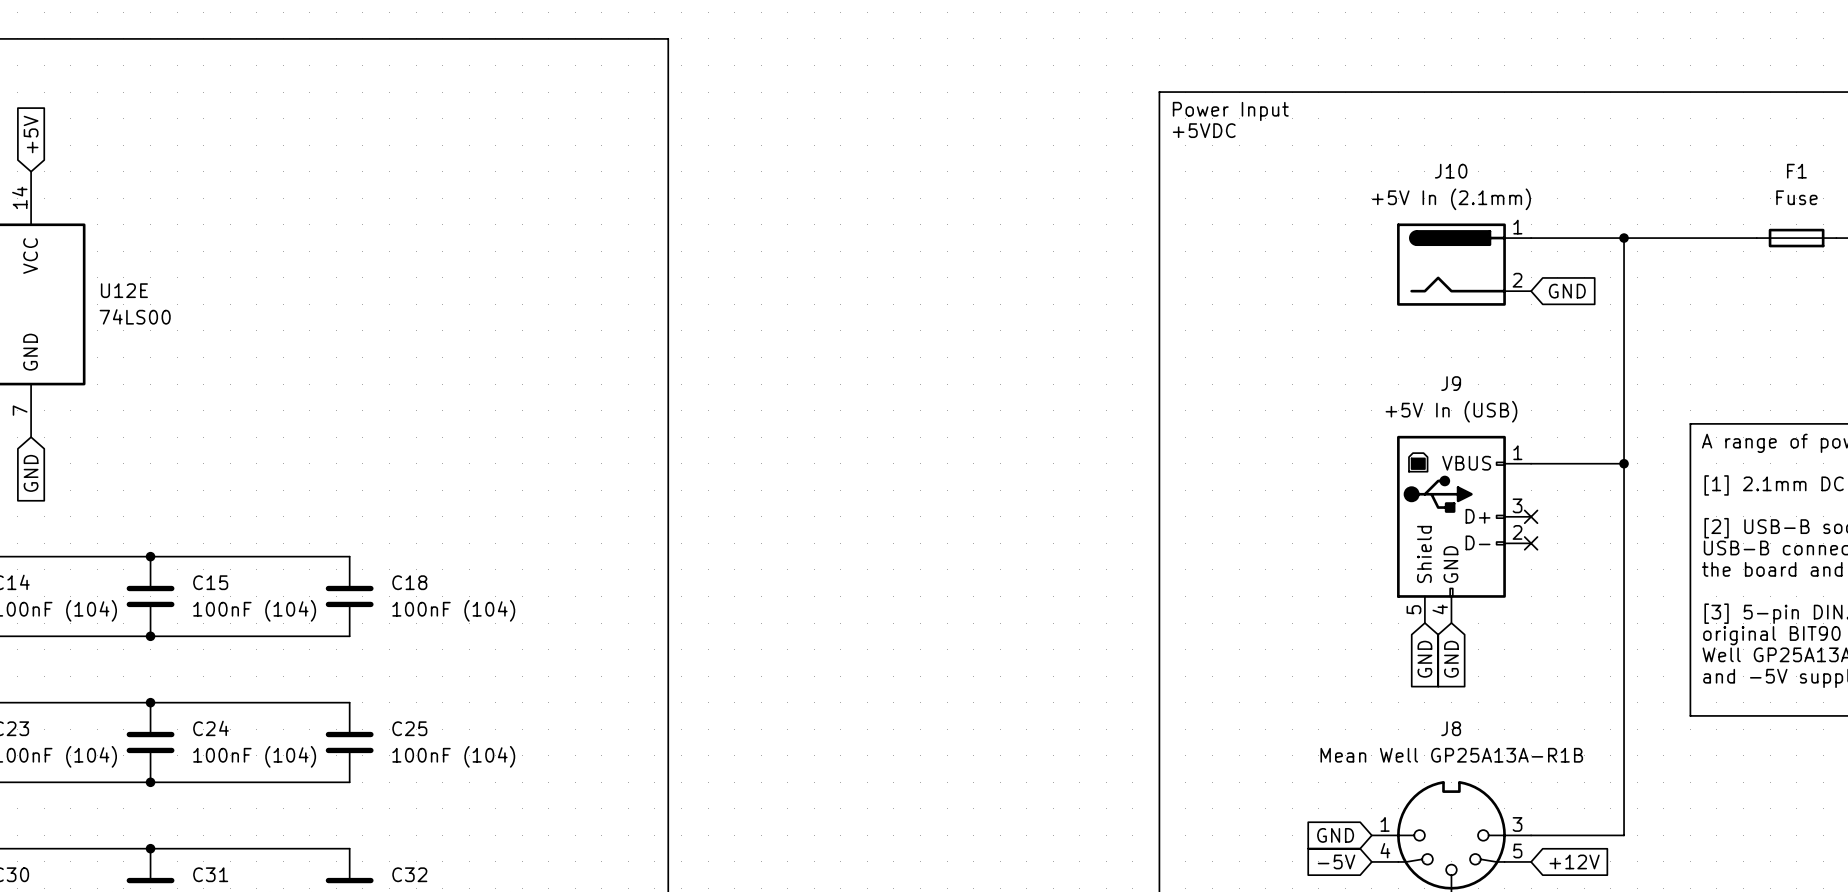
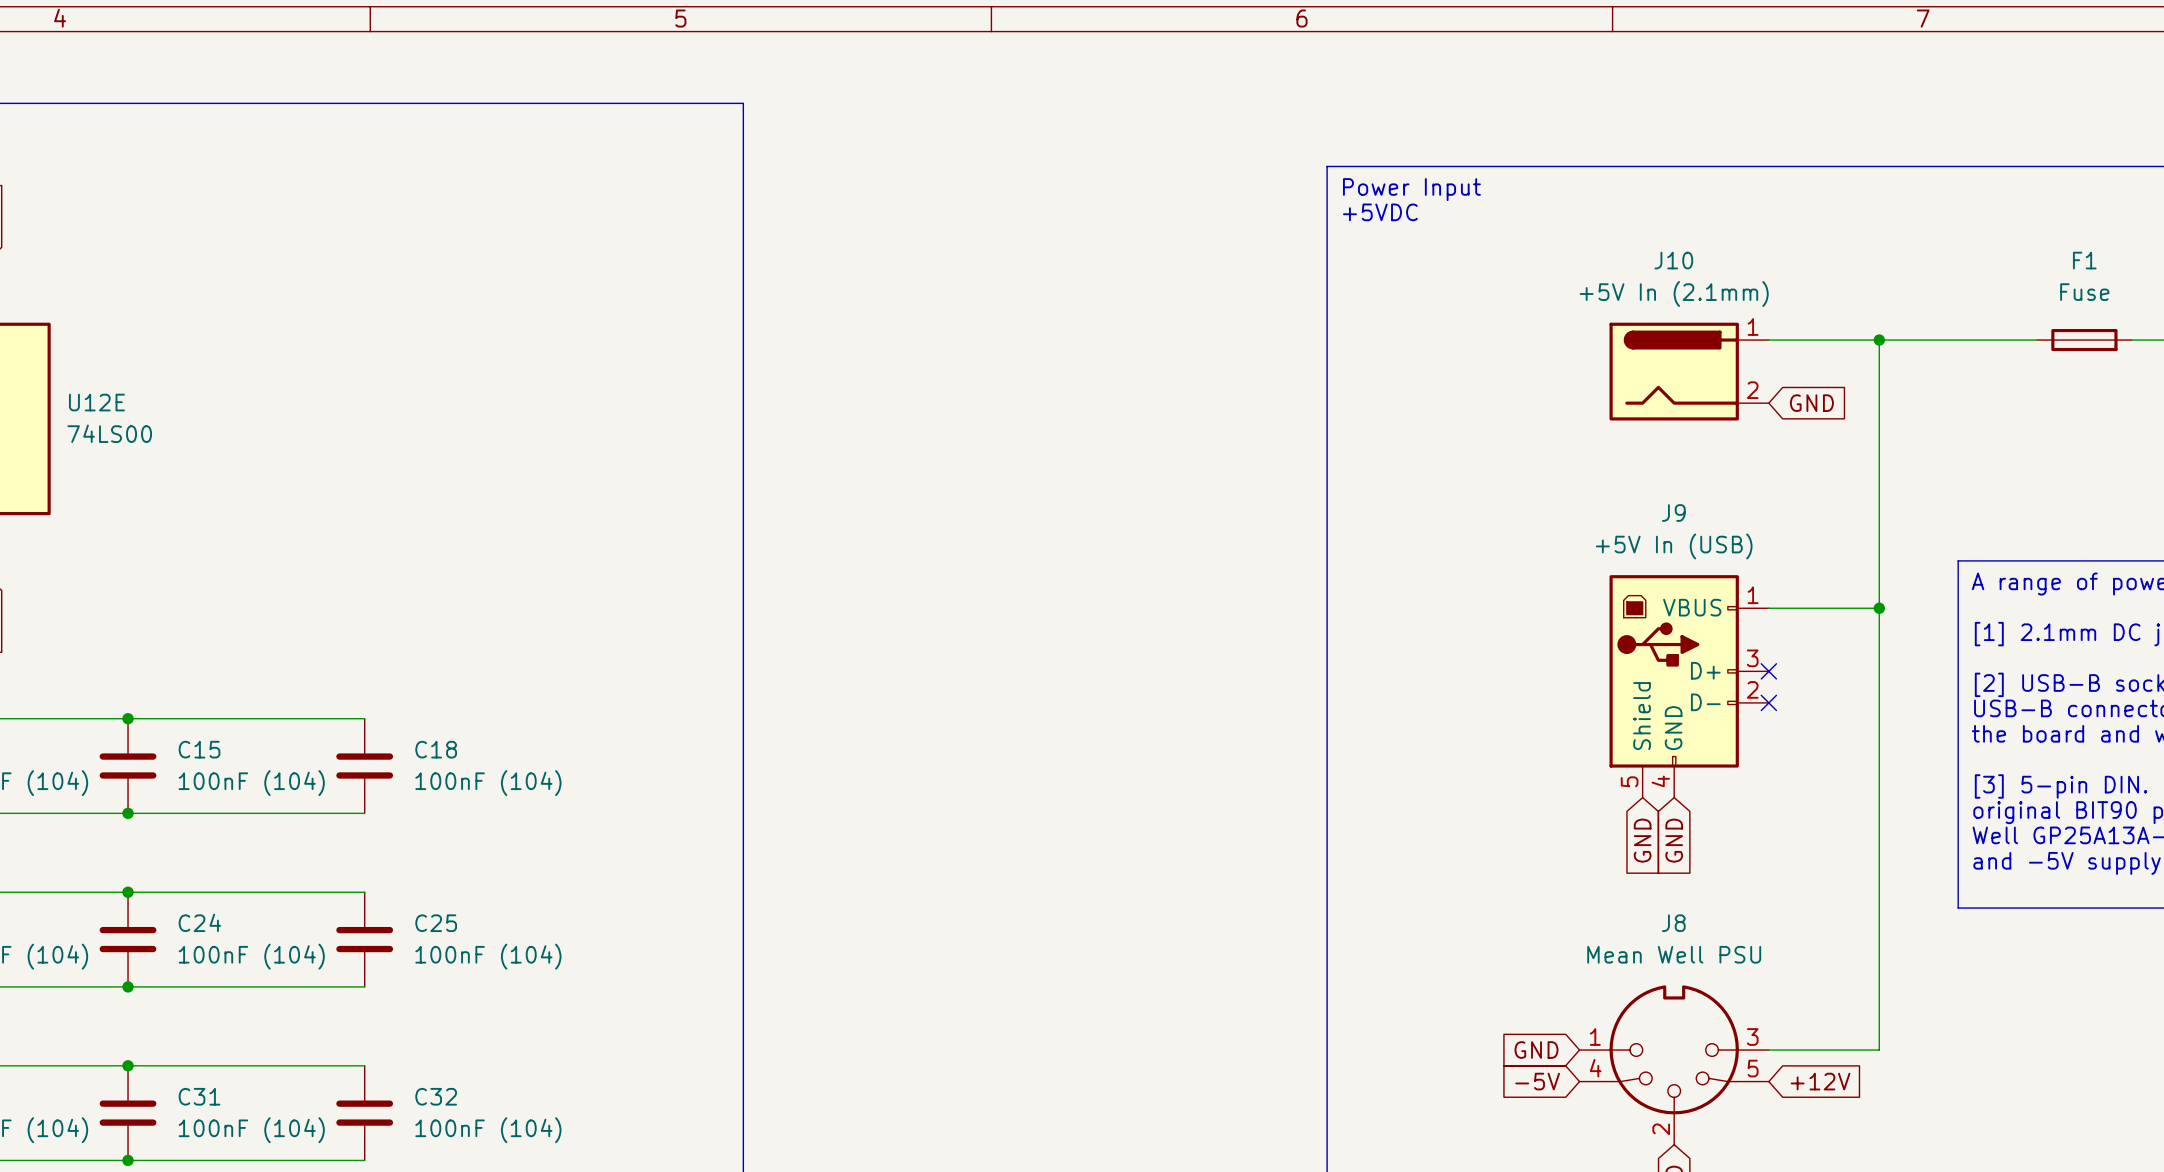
J8 value: Mean Well GP25A13A-R1B (1451, 755) -> Mean Well PSU (1674, 954)

